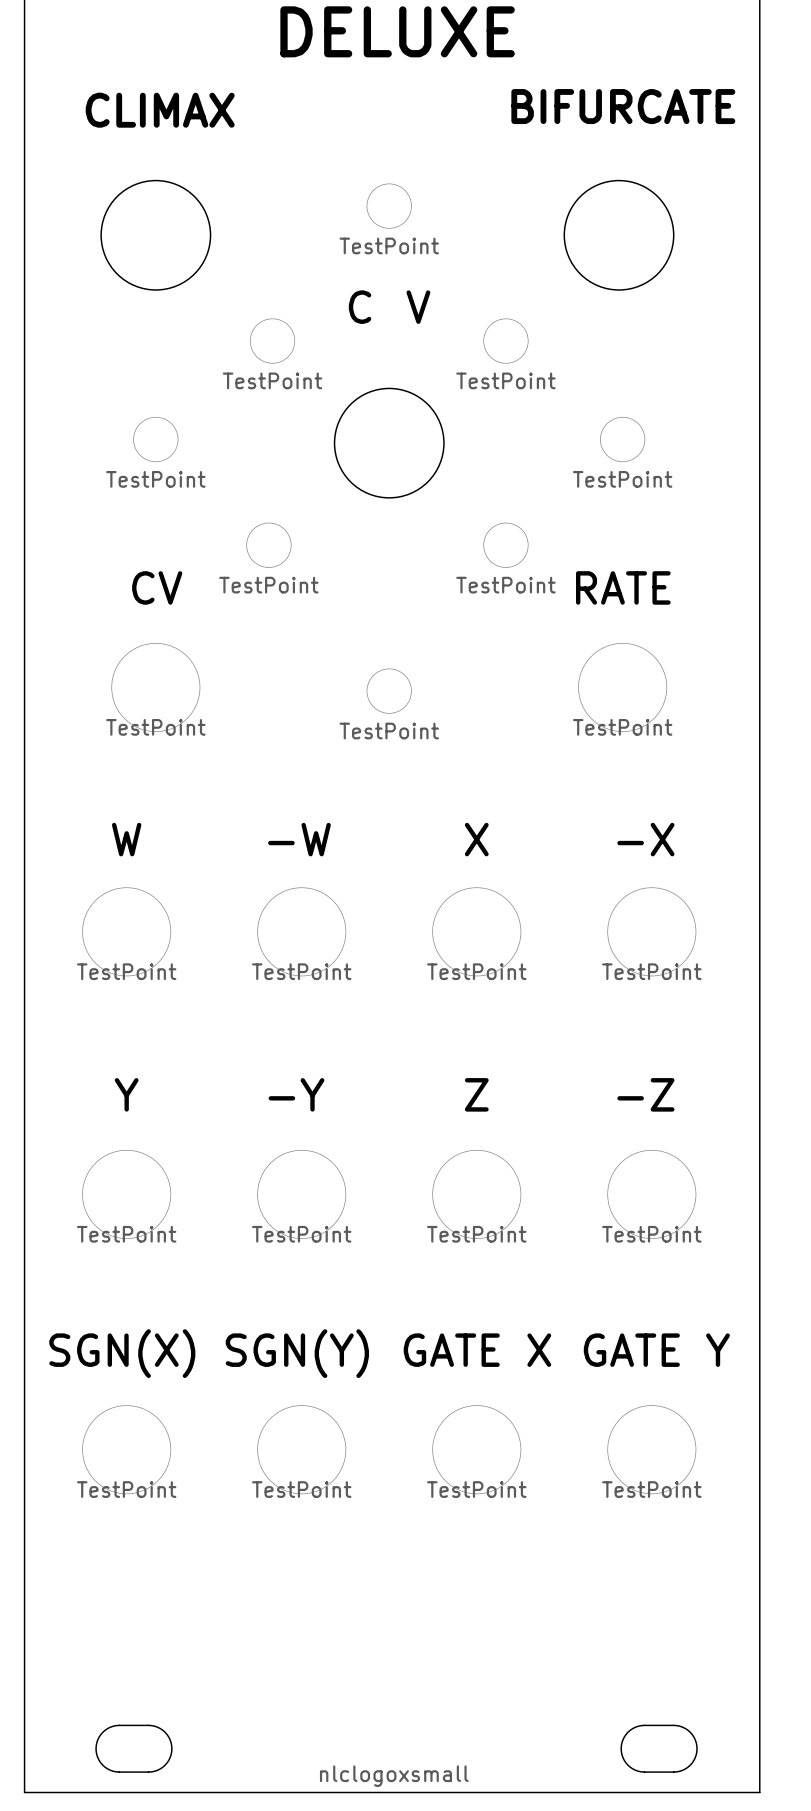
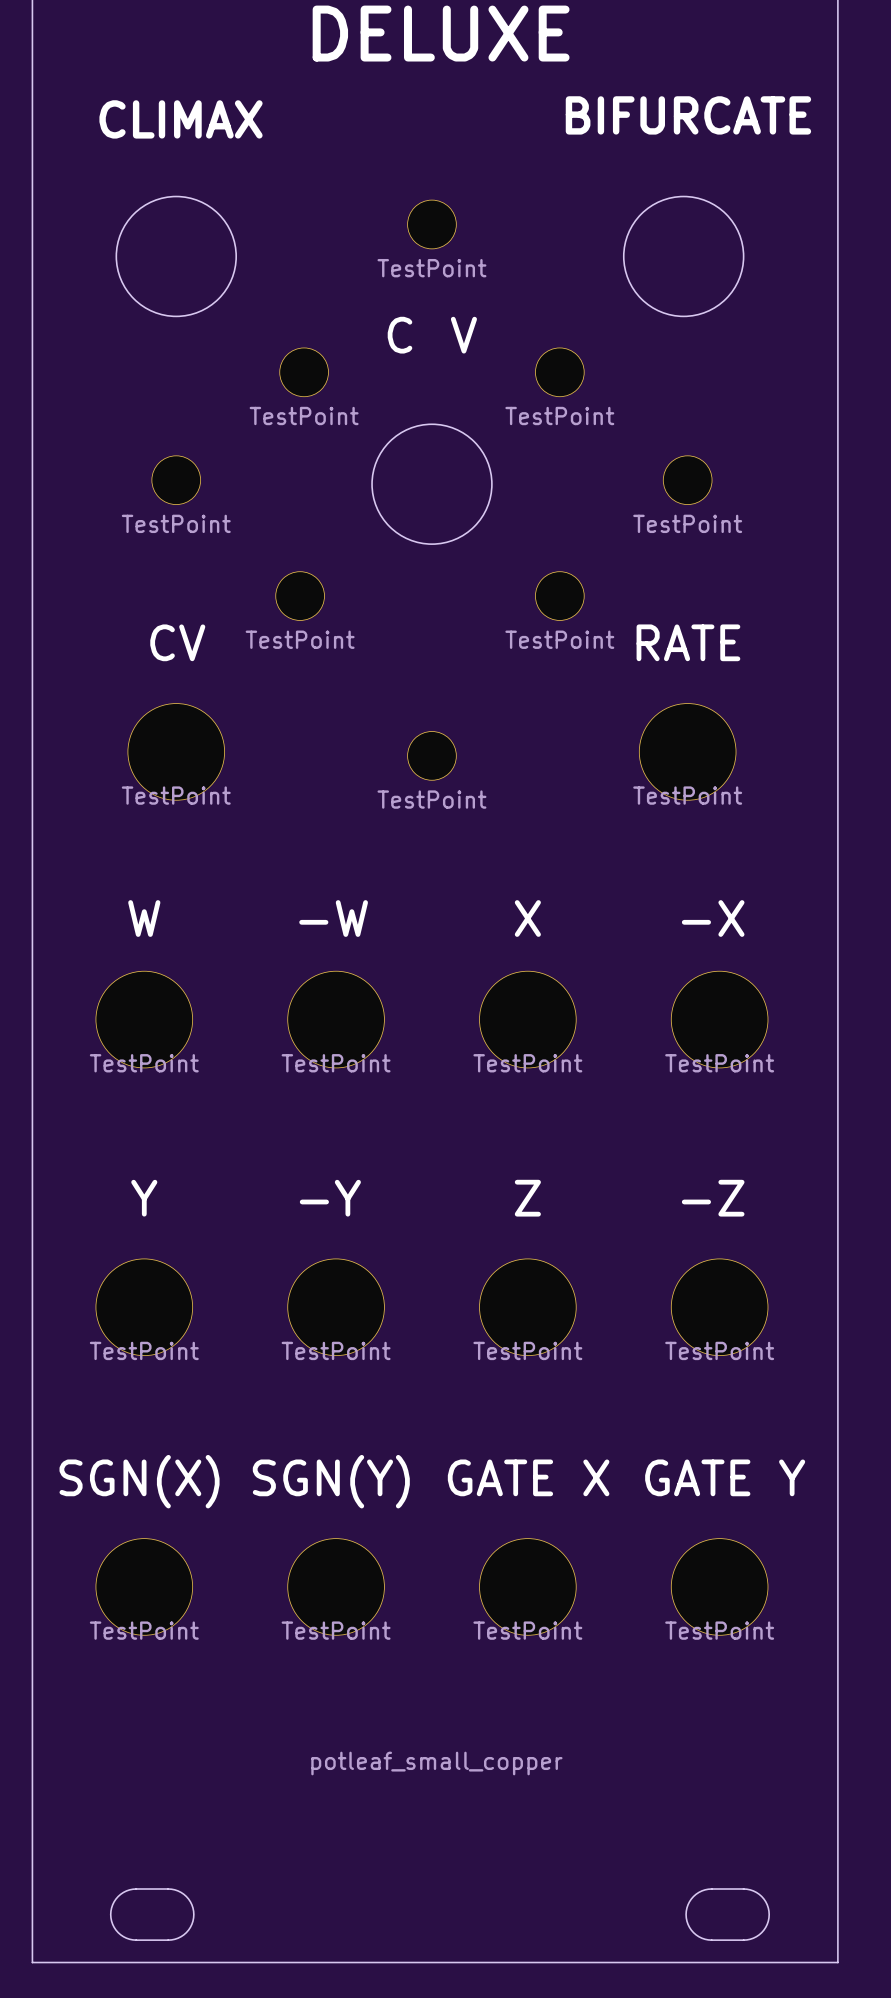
drawing: none -> [311, 1751, 563, 1776]
drawing: [319, 1765, 469, 1787] -> none

